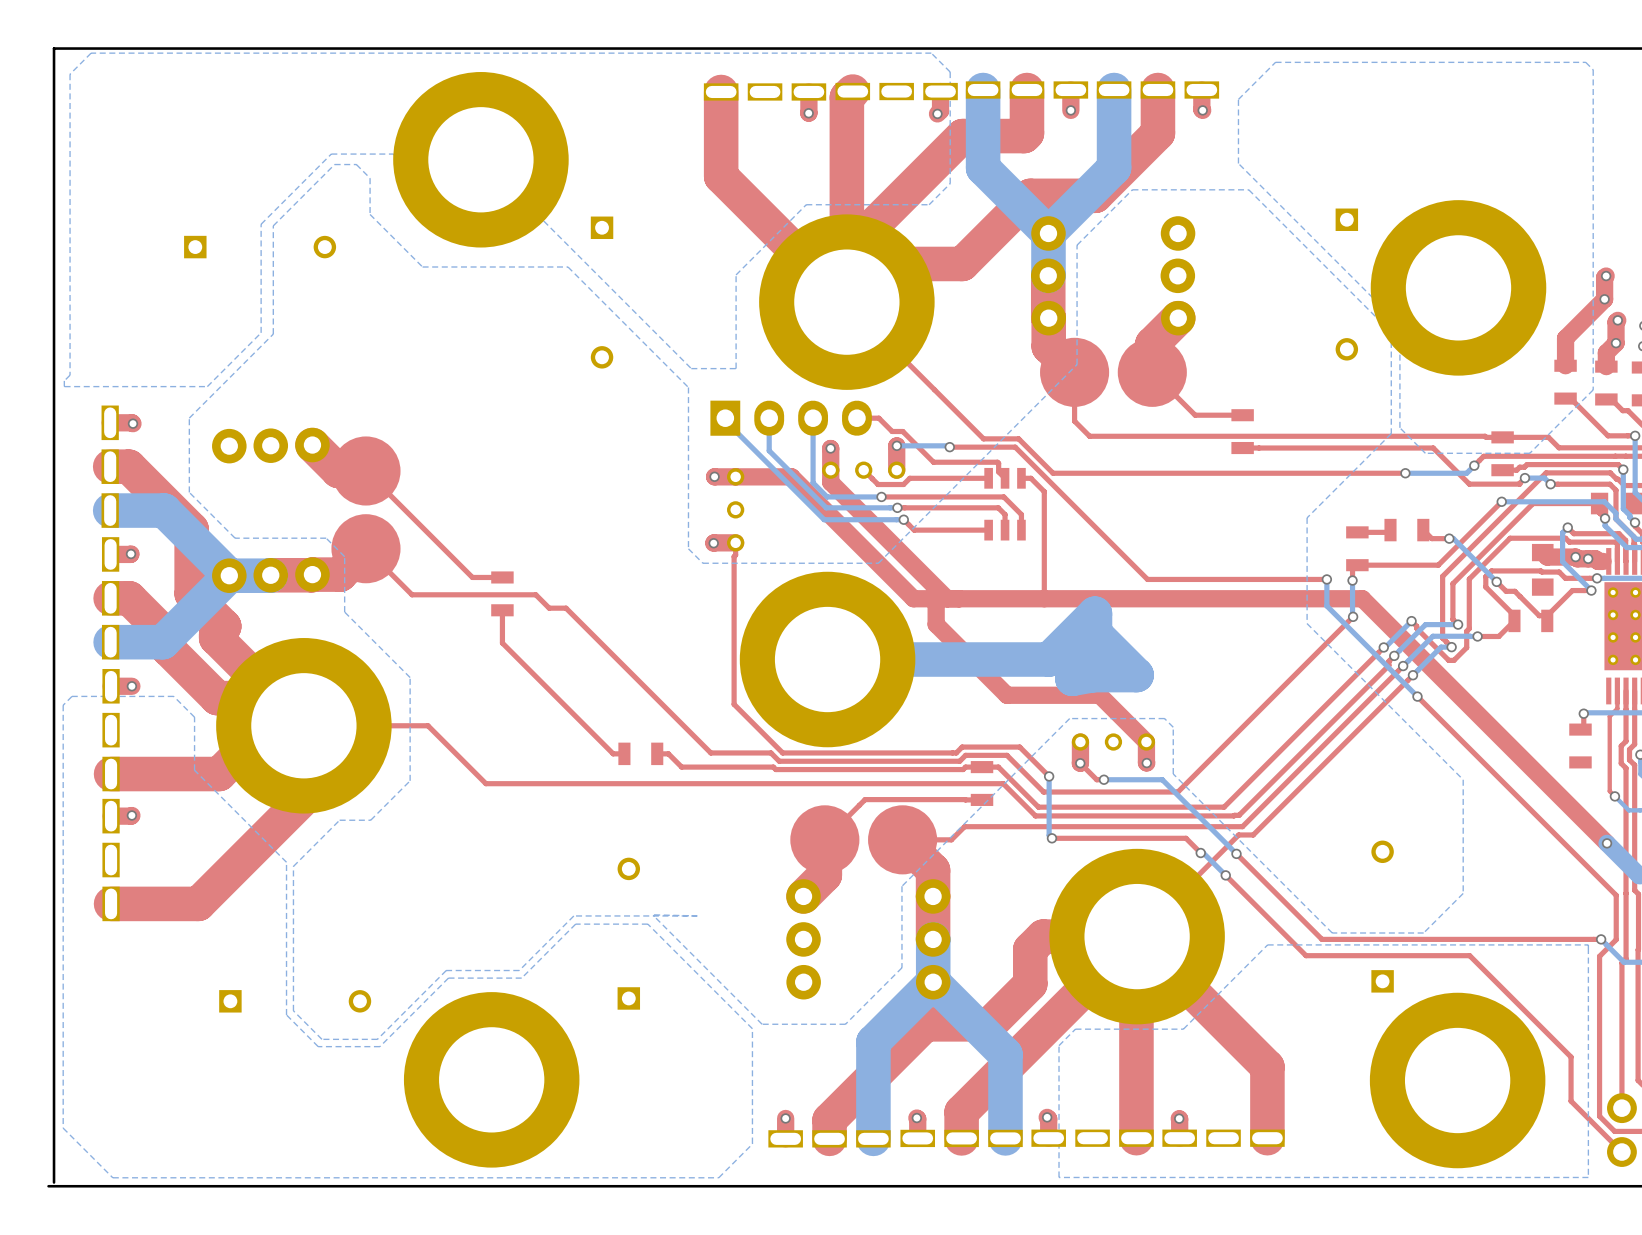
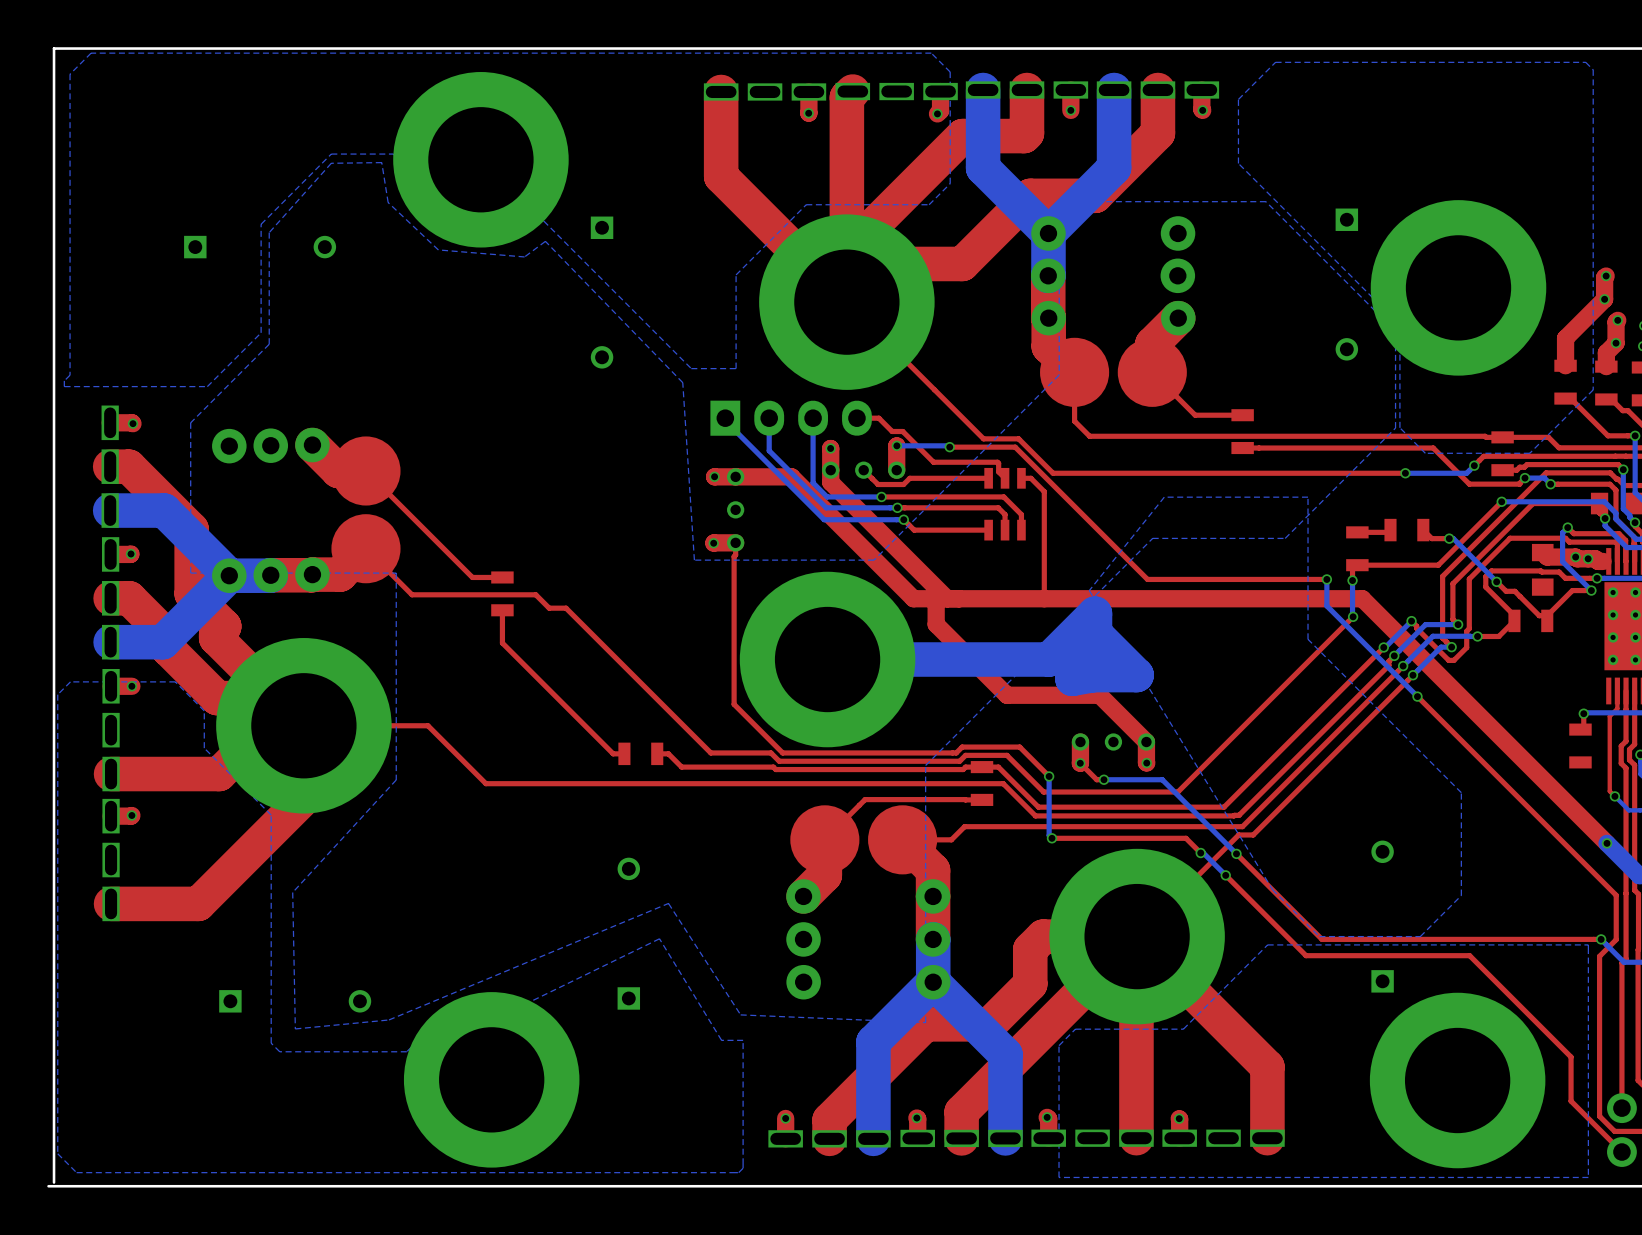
bottom zone outline: (356, 164) (334, 164) (273, 225) (273, 334) (189, 418) (189, 492) (235, 538) (326, 538) (344, 556) (344, 612) (410, 677) (410, 780) (370, 820) (339, 820) (293, 866) (293, 1010) (321, 1039) (377, 1039) (446, 970) (519, 970) (573, 915) (697, 915) (654, 914) (654, 916) (762, 1024) (845, 1024) (901, 967) (901, 886) (1069, 718) (1164, 718) (1173, 727) (1173, 773) (1332, 932) (1423, 932) (1463, 893) (1463, 779) (1307, 623) (1307, 517) (1391, 433) (1391, 332) (1248, 189) (1132, 189) (1077, 245) (1077, 364) (878, 563) (702, 563) (688, 548) (688, 387) (567, 266) (422, 266) (370, 214) (370, 178) (356, 164) -> (381, 162) (388, 202) (438, 249) (524, 256) (545, 241) (682, 382) (694, 560) (874, 560) (1059, 374) (1059, 201) (1265, 201) (1395, 331) (1395, 428) (1285, 538) (1152, 538) (925, 765) (925, 1022) (740, 1014) (668, 903) (389, 1019) (295, 1028) (292, 892) (396, 779) (396, 573) (190, 573) (190, 422) (269, 344) (269, 232) (331, 163) (381, 162)
bottom zone outline: none -> (1308, 497) (1308, 639) (1461, 792) (1461, 895) (1420, 936) (1319, 936) (1272, 889) (1089, 590) (1164, 497) (1308, 497)
bottom zone outline: (173, 696) (194, 717) (194, 770) (286, 862) (286, 1014) (318, 1046) (379, 1046) (448, 978) (521, 978) (575, 924) (647, 924) (752, 1028) (752, 1143) (718, 1177) (112, 1177) (63, 1128) (63, 705) (72, 696) (173, 696) -> (175, 681) (204, 710) (204, 748) (271, 815) (271, 1043) (279, 1051) (406, 1051) (452, 1006) (520, 1006) (659, 938) (721, 1040) (743, 1040) (743, 1168) (738, 1172) (76, 1172) (57, 1153) (57, 694) (70, 681) (175, 681)

